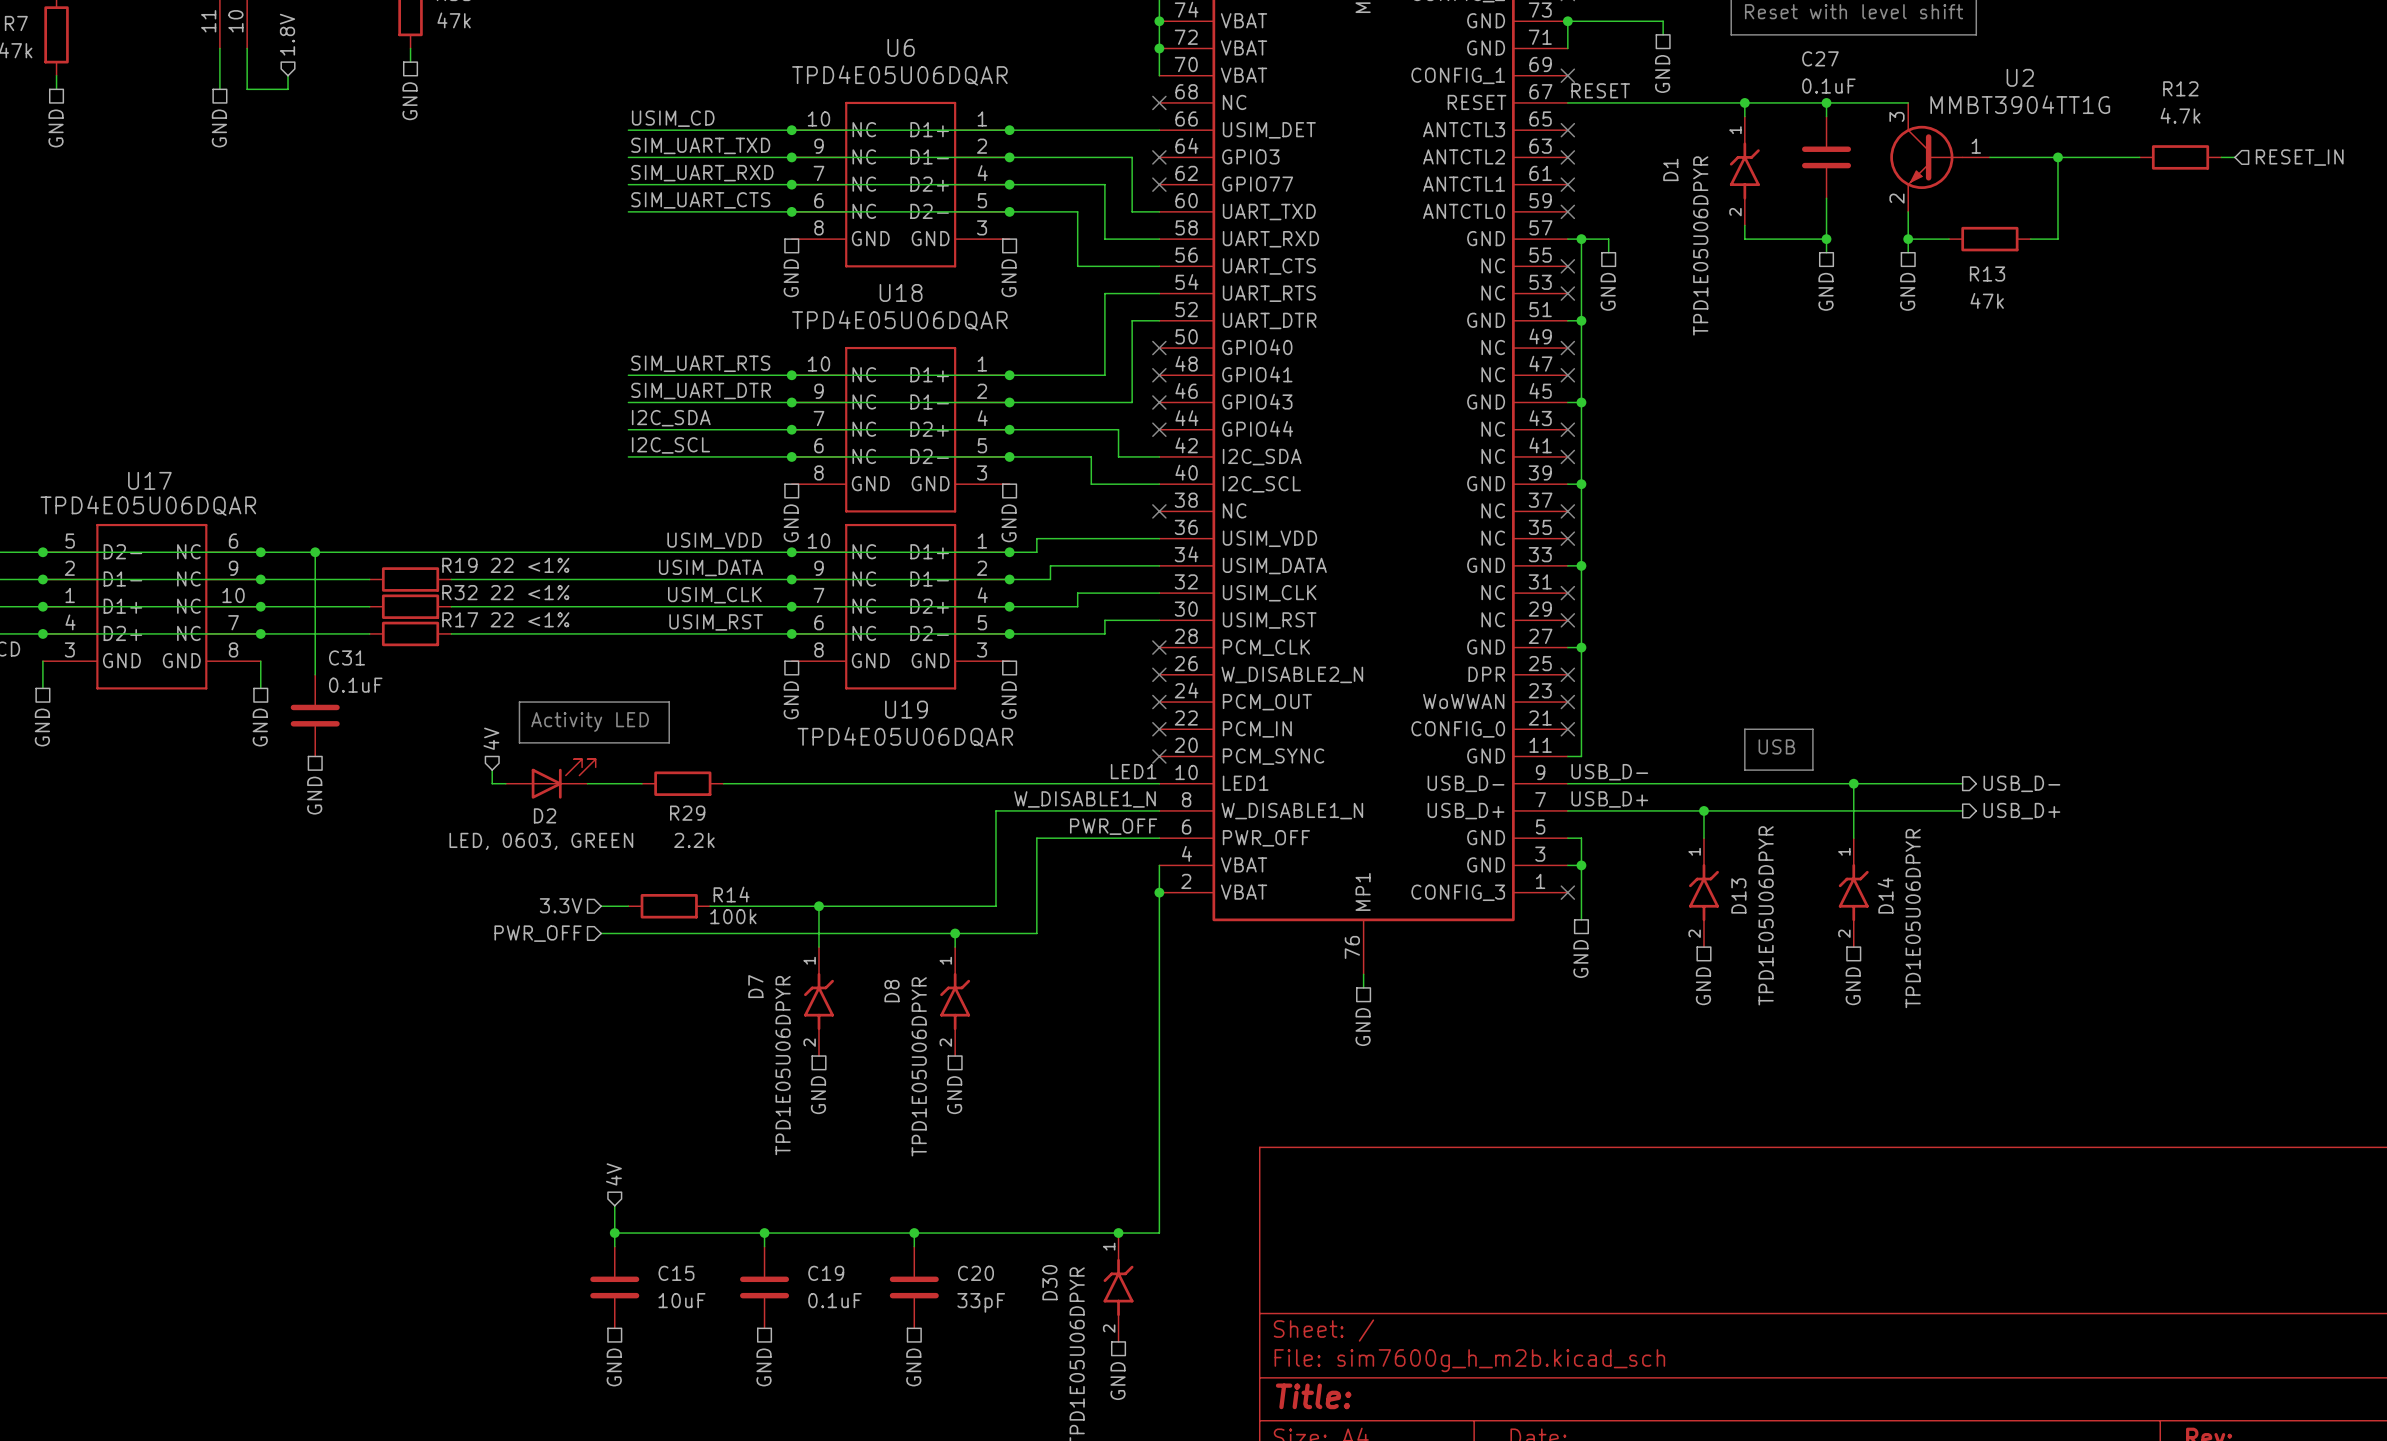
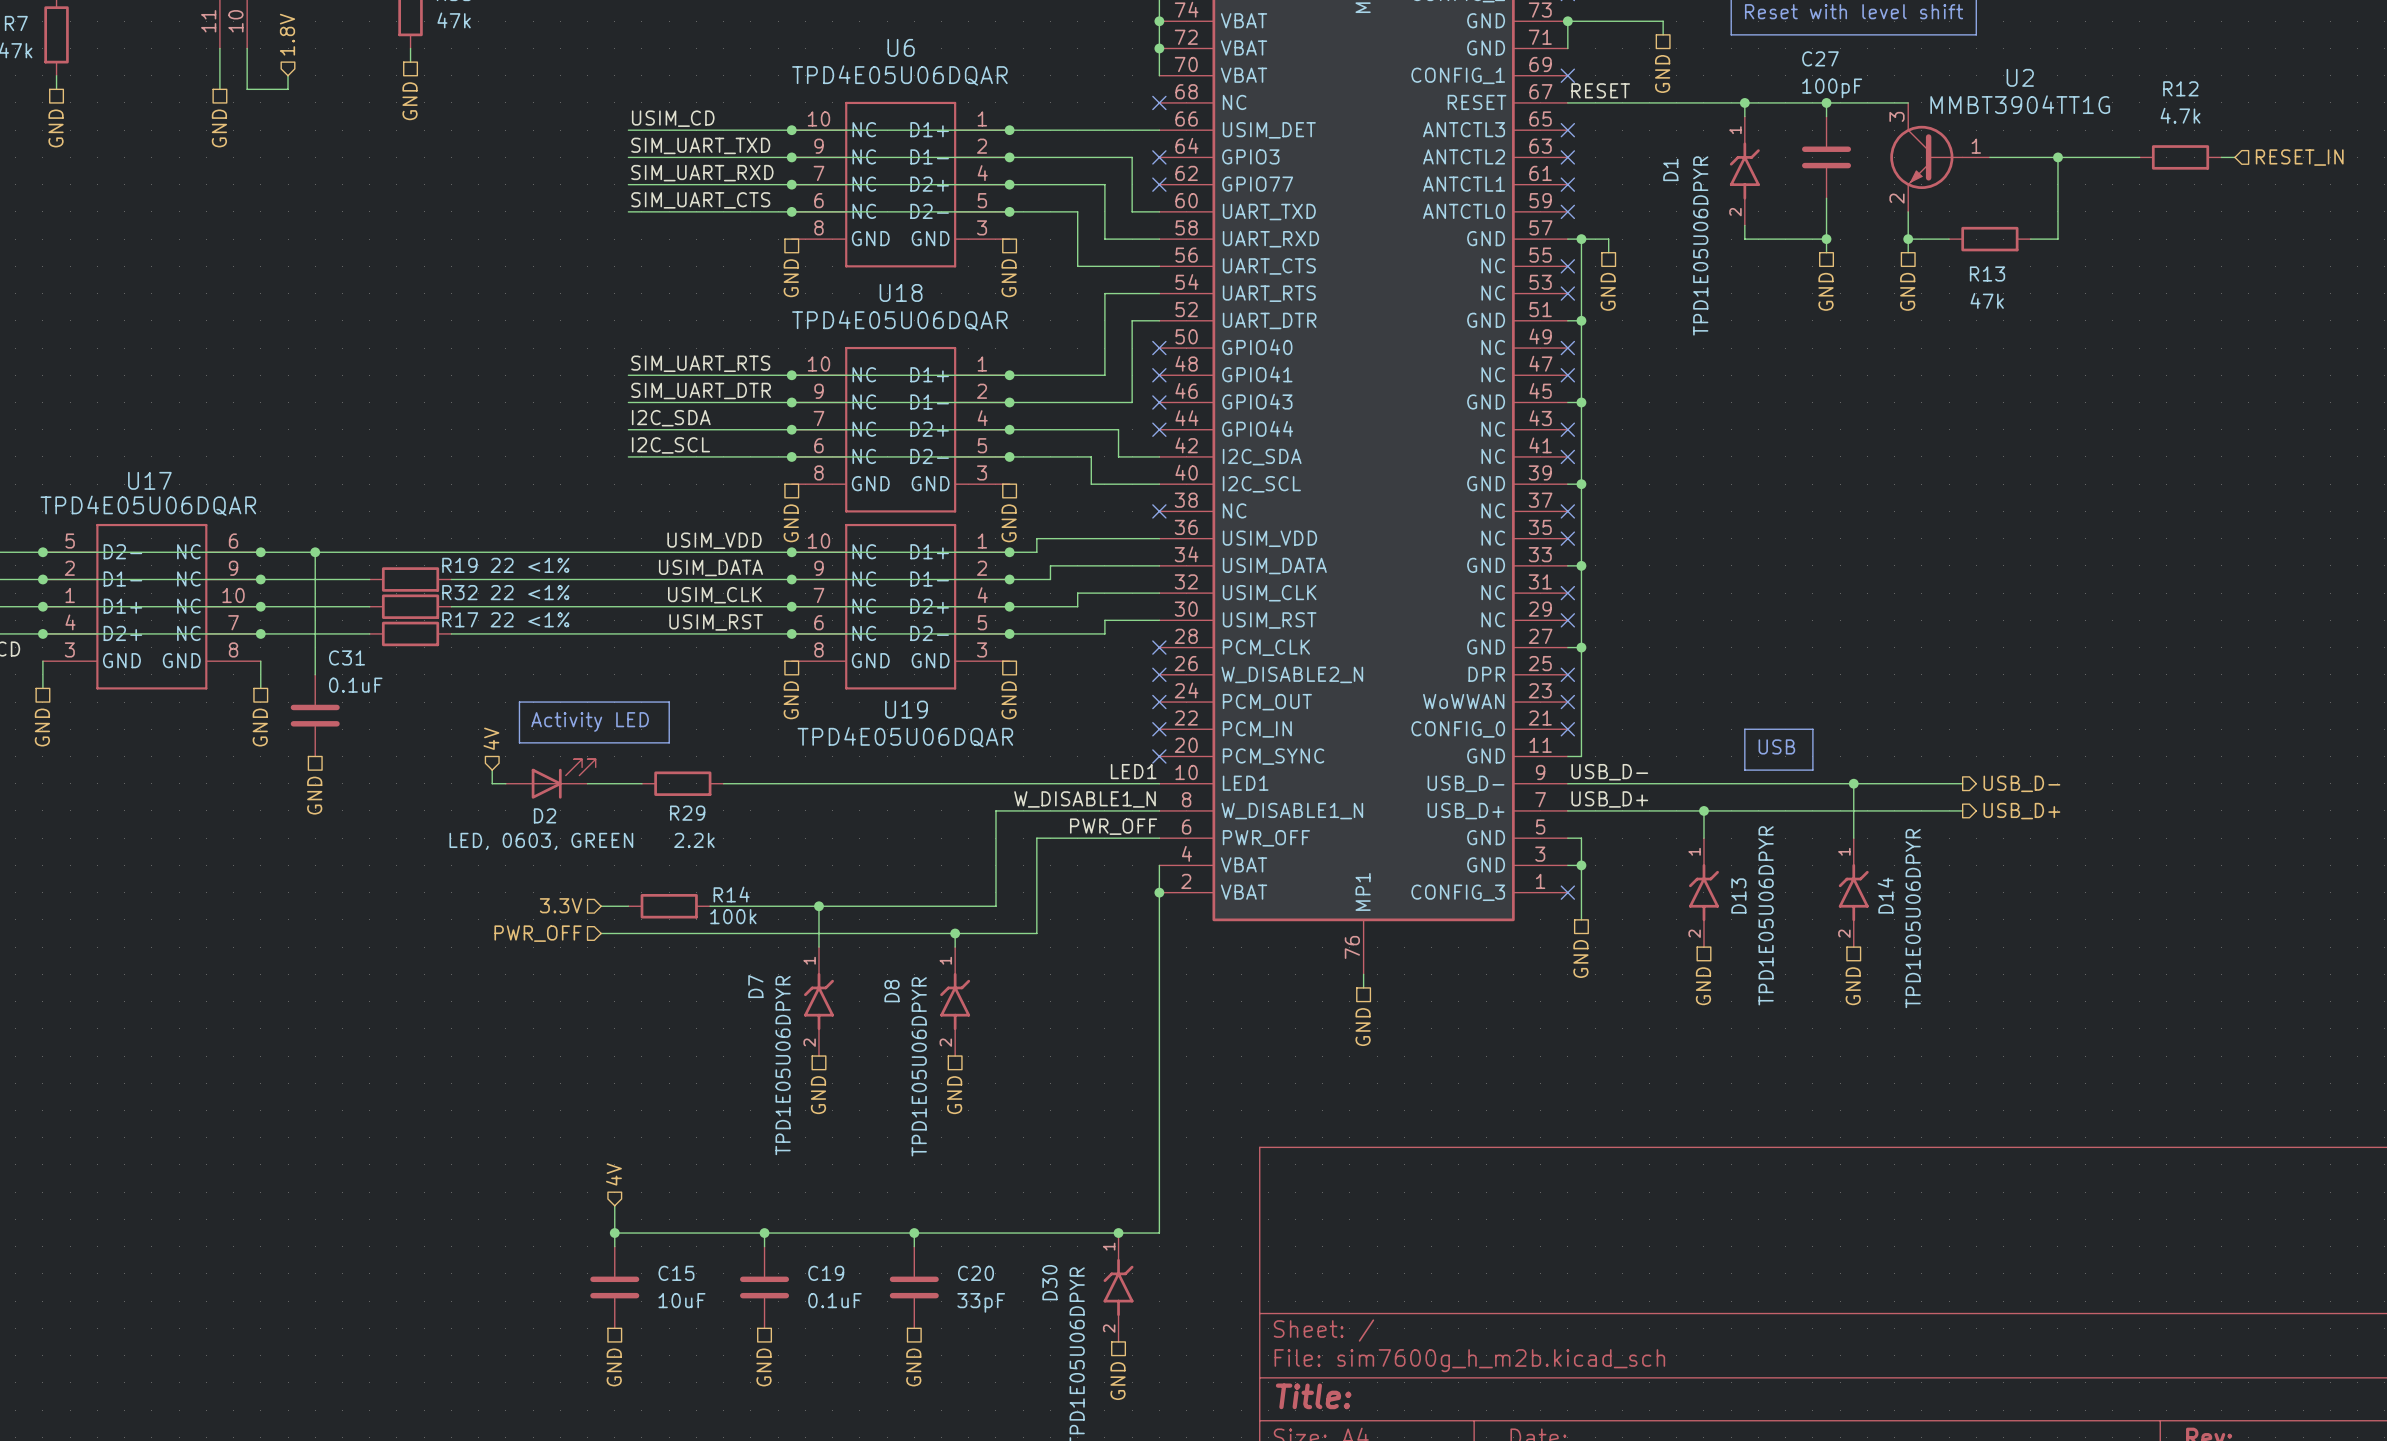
C27 value: 0.1uF (1828, 86) -> 100pF (1832, 88)

